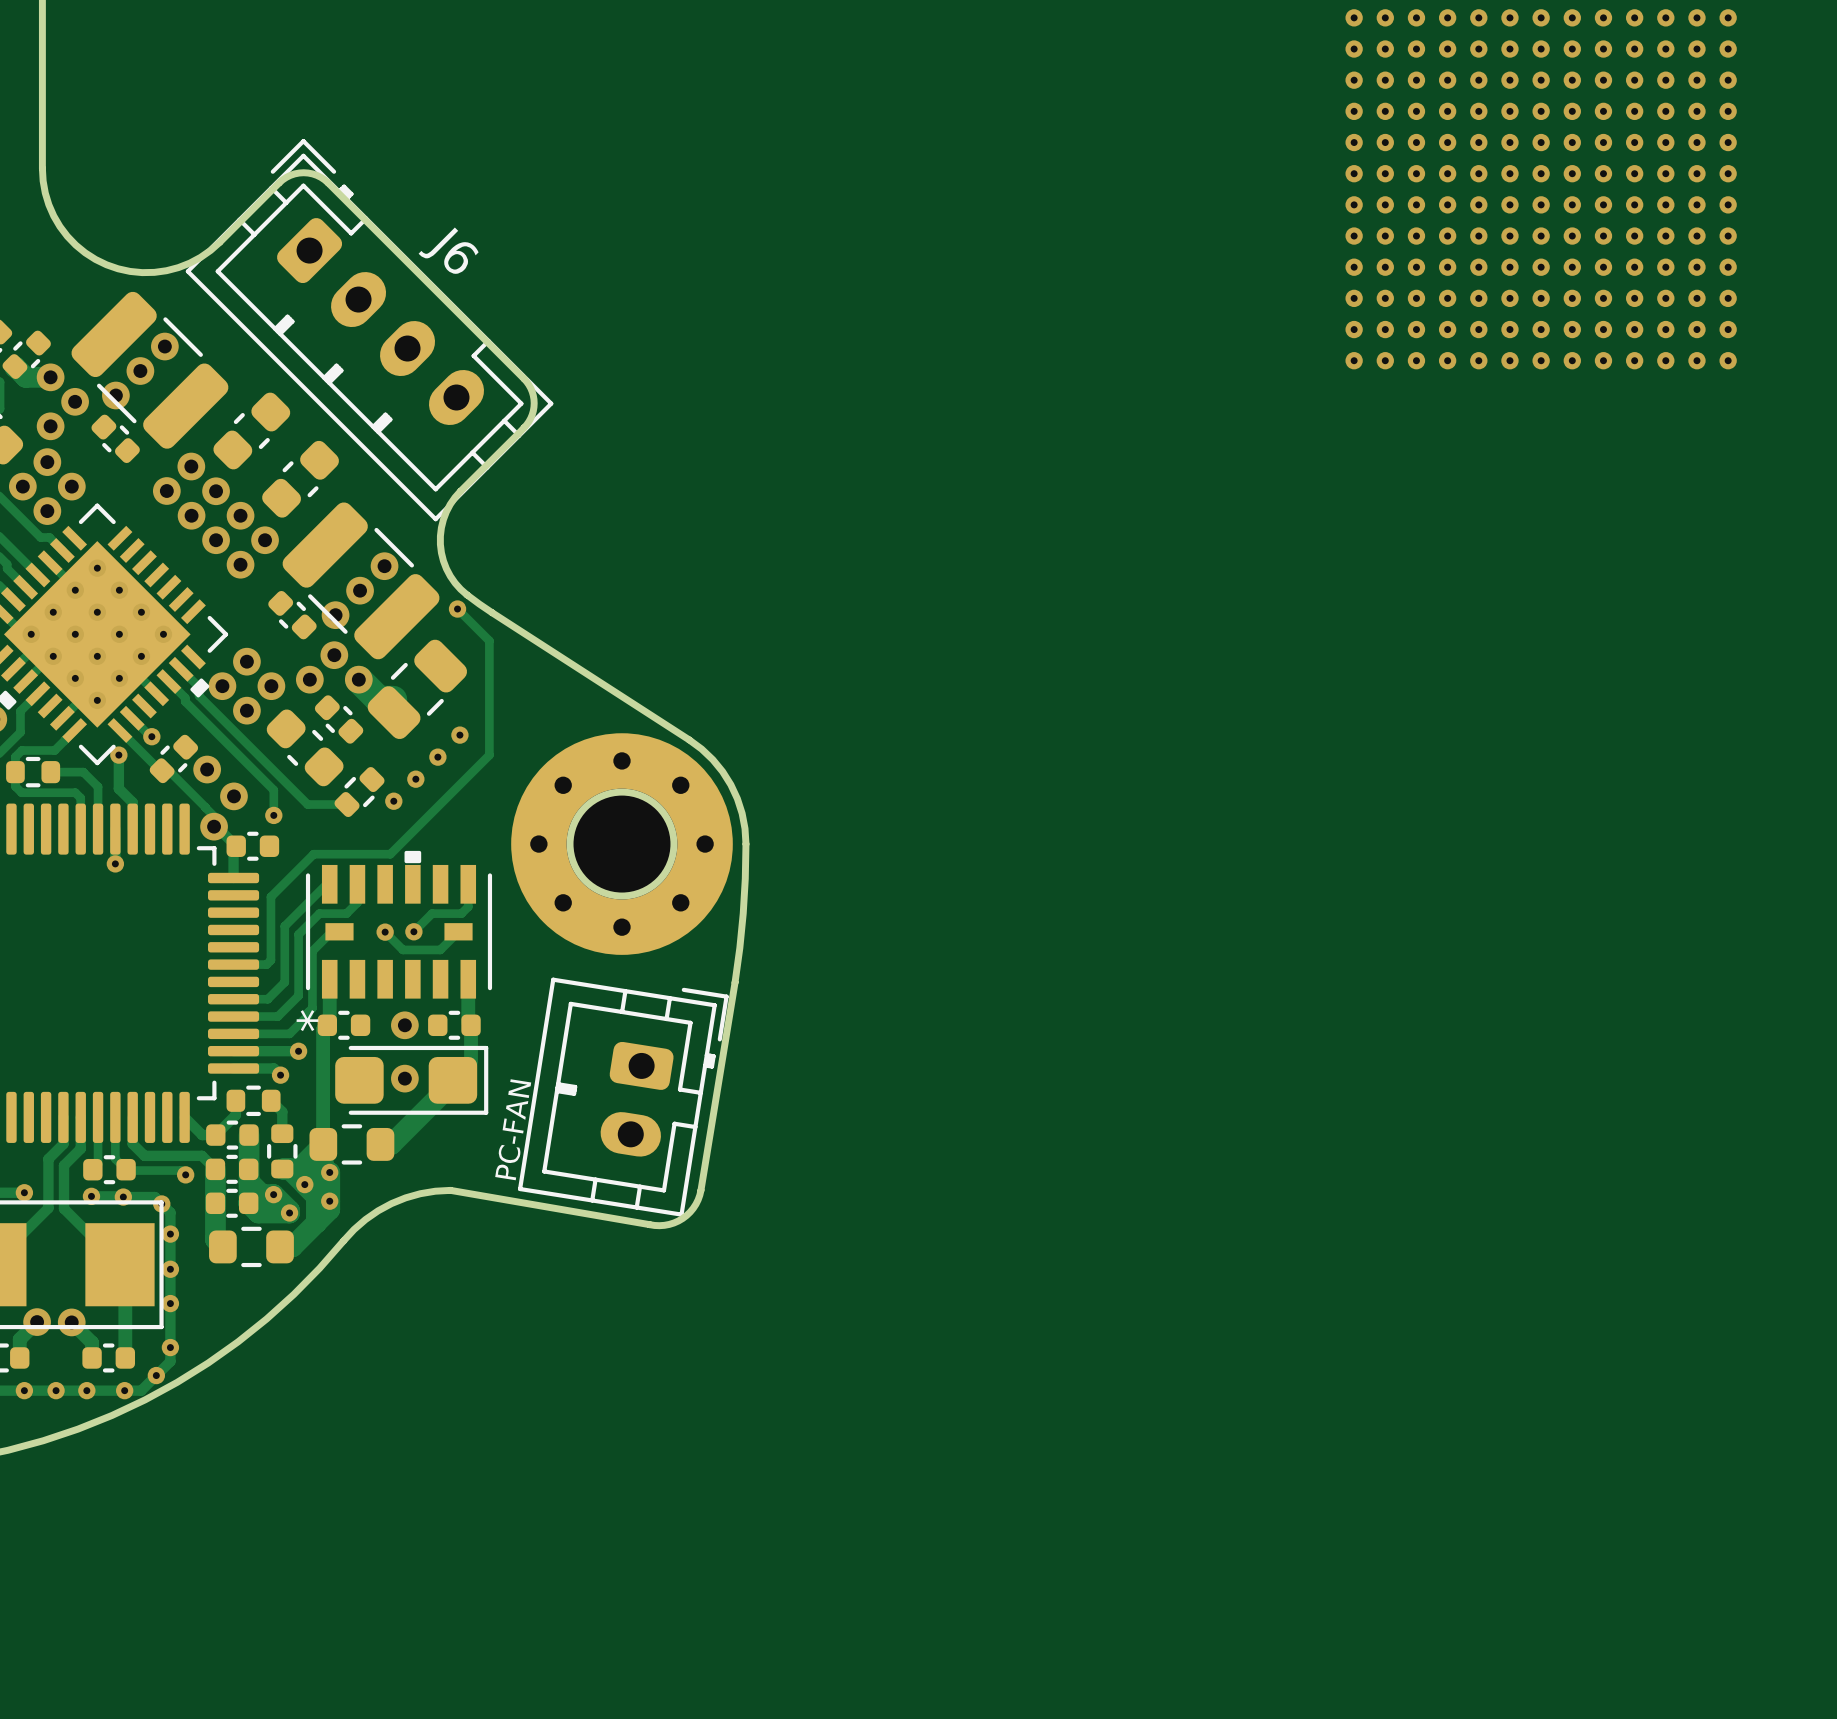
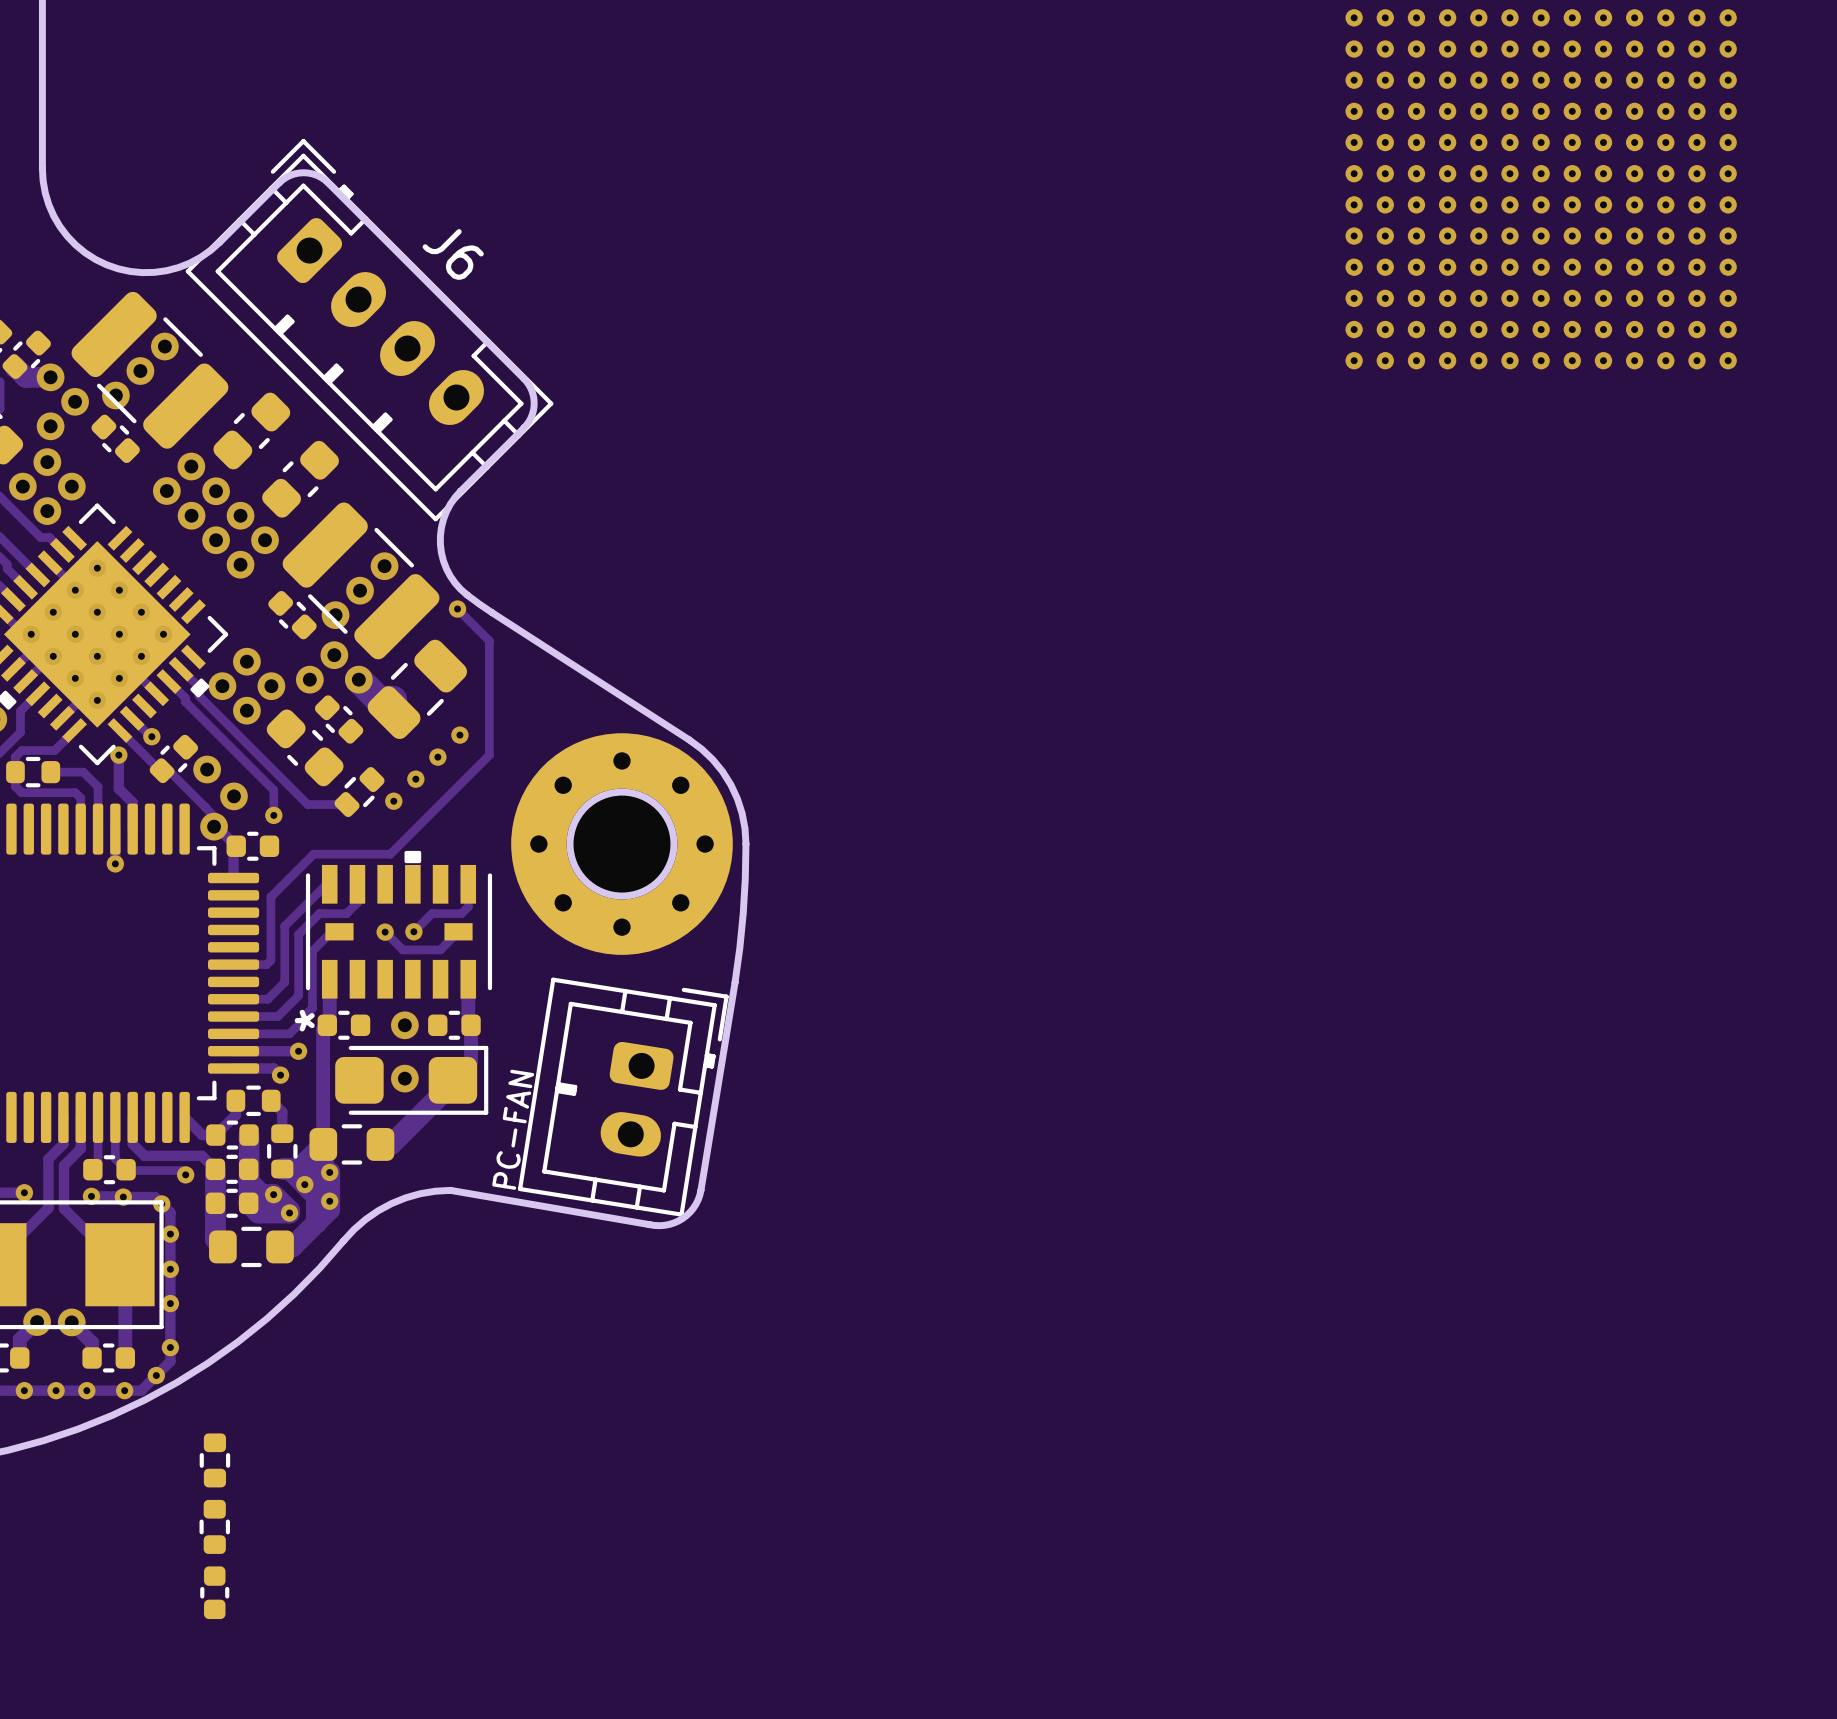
part: none -> (214, 1460)
part: none -> (214, 1526)
part: none -> (214, 1592)

